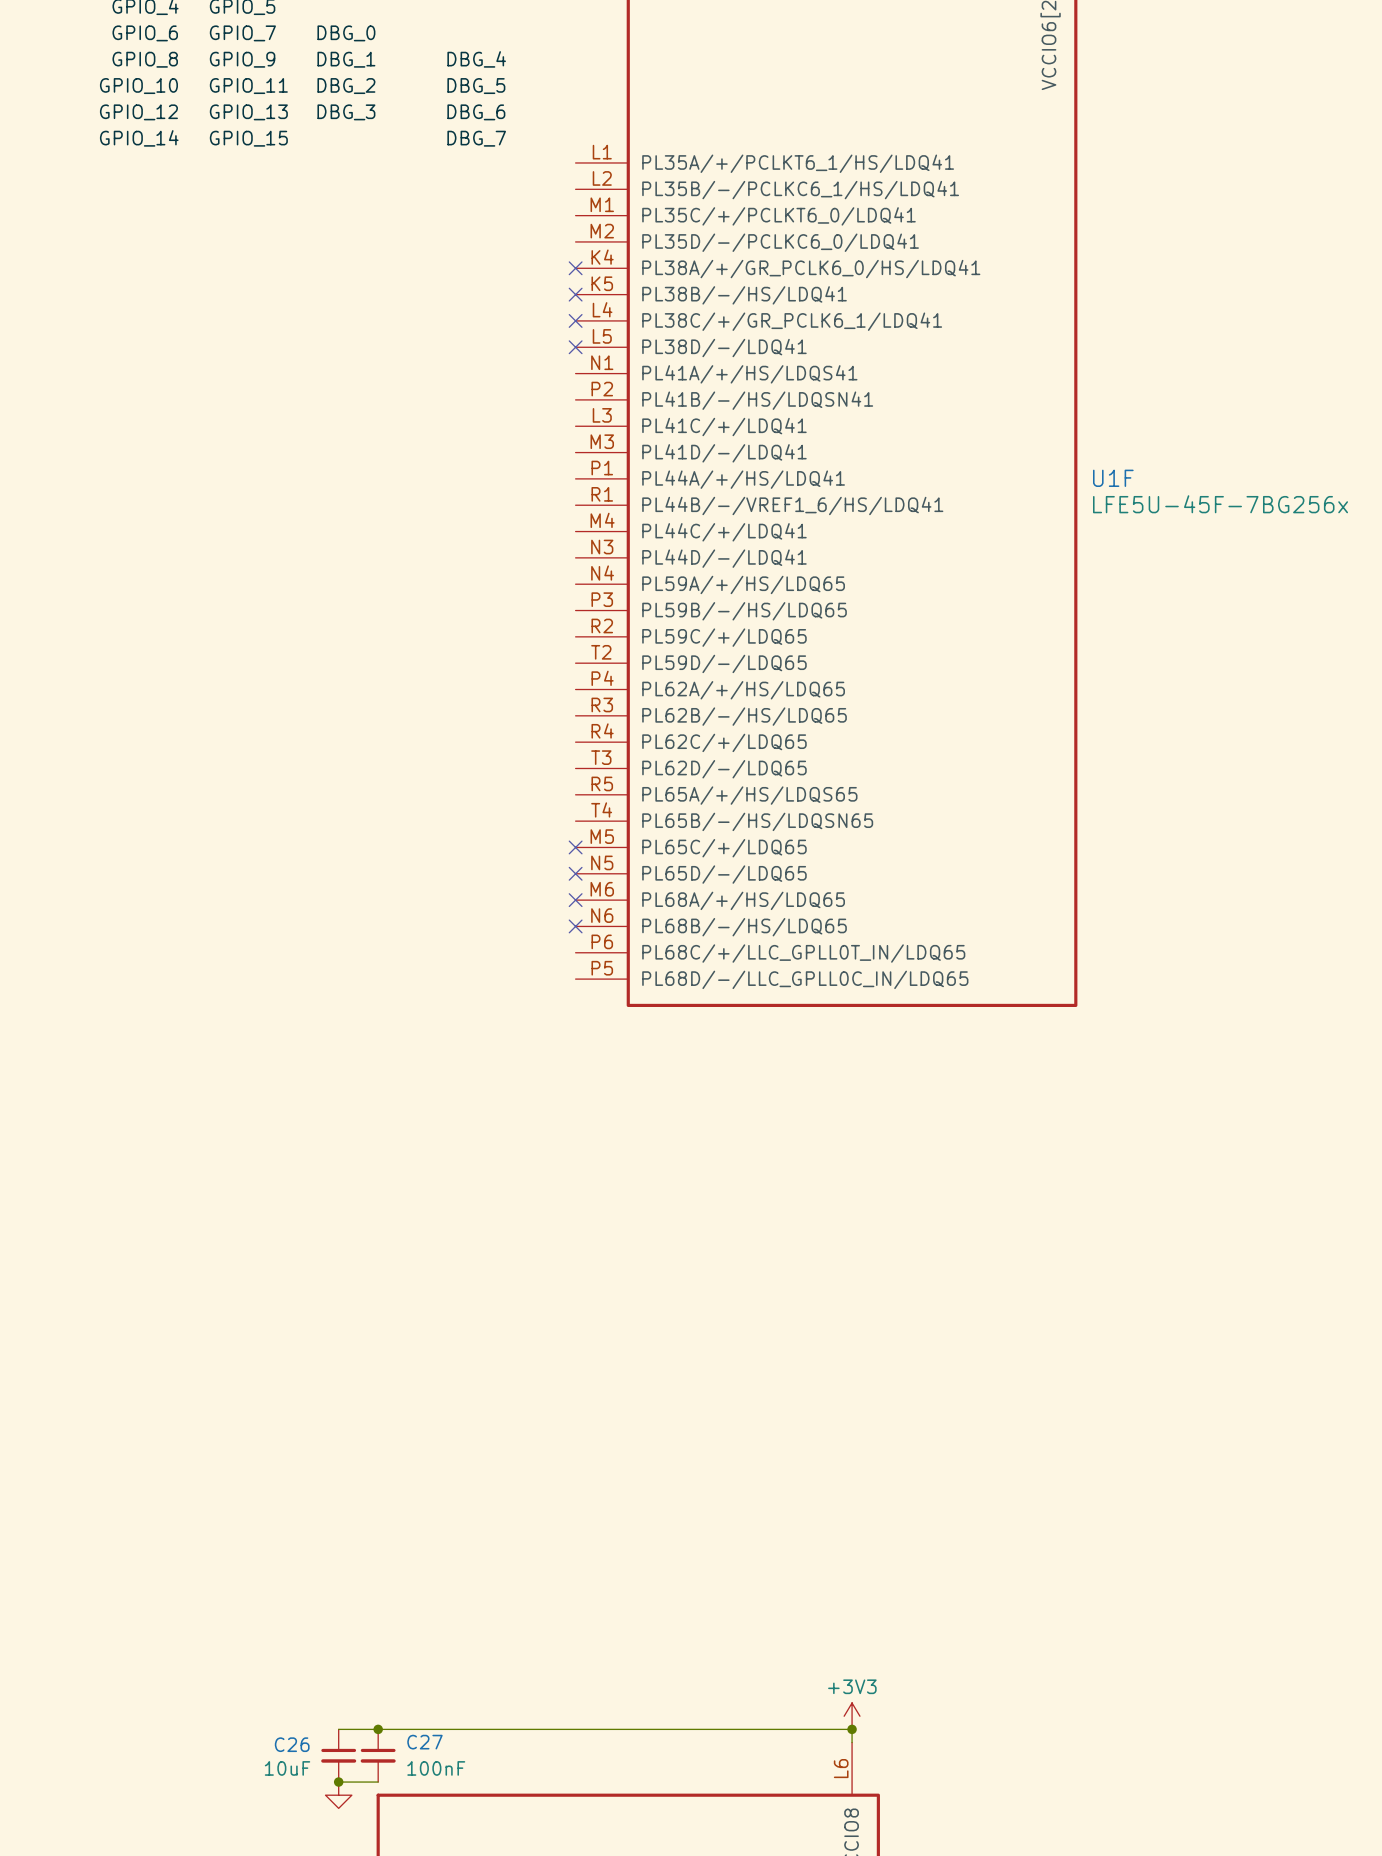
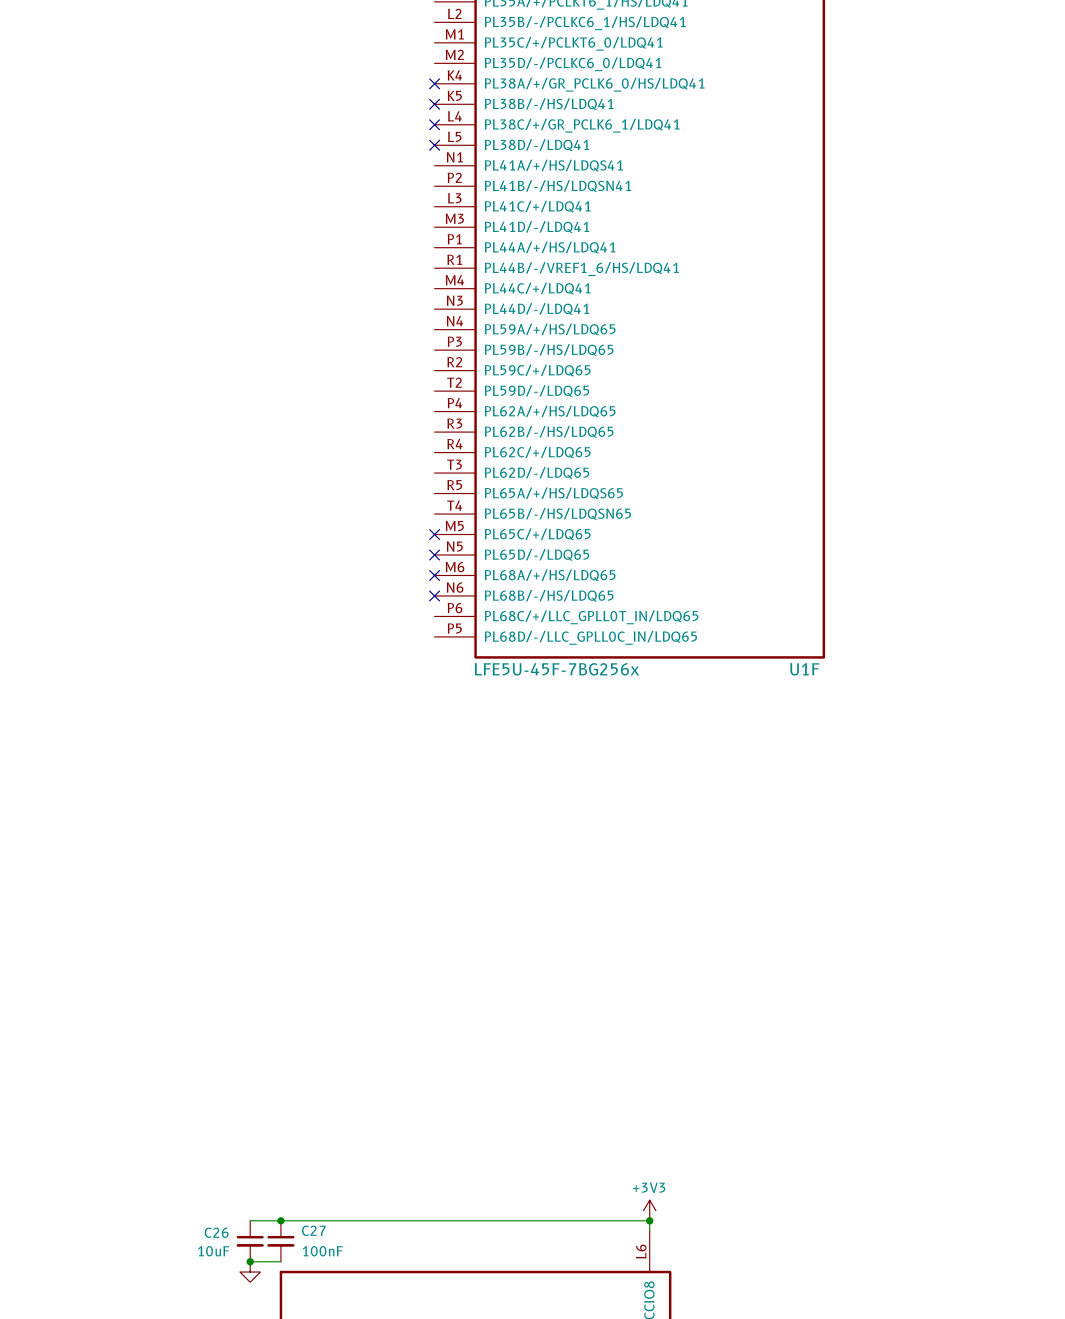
U1F name position: U1F (1113, 478) -> U1F (804, 669)
U1F value position: LFE5U-45F-7BG256x (1220, 504) -> LFE5U-45F-7BG256x (556, 669)

